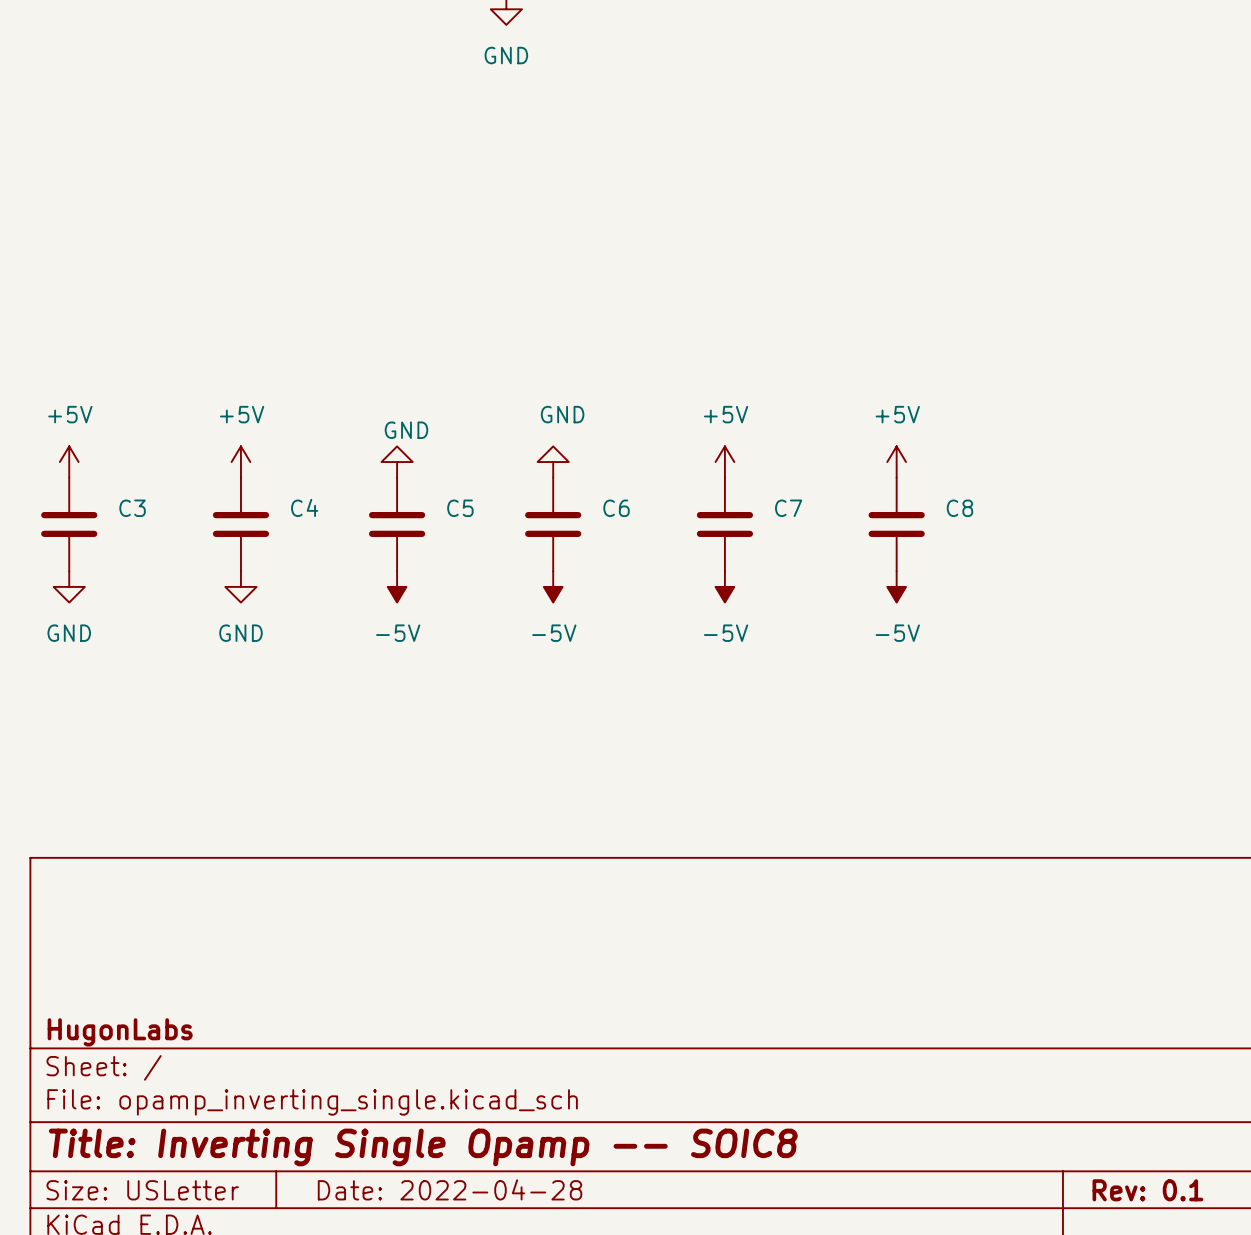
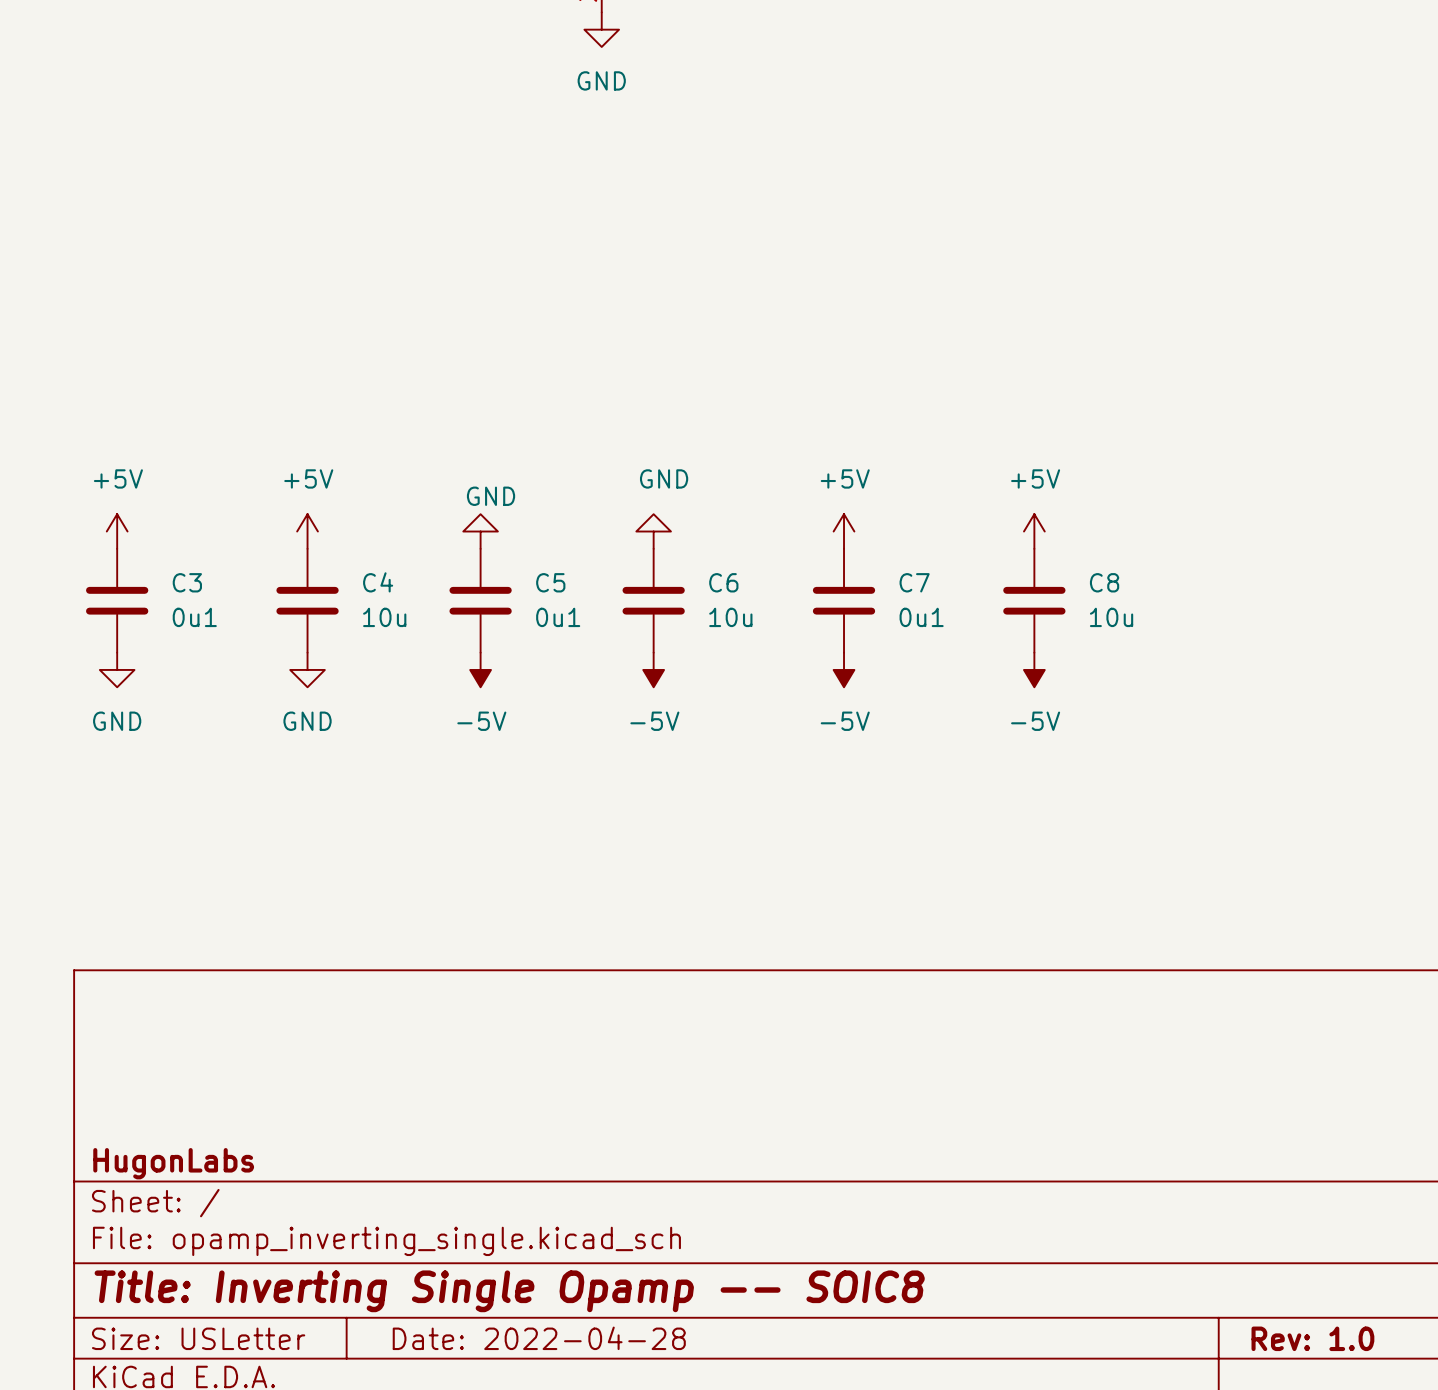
C3 value: none -> 0u1 (194, 617)
C4 value: none -> 10u (384, 617)
C5 value: none -> 0u1 (558, 617)
C6 value: none -> 10u (730, 617)
C7 value: none -> 0u1 (921, 617)
C8 value: none -> 10u (1111, 617)
title block: Rev: 0.1 (1147, 1190) -> Rev: 1.0 (1312, 1338)

